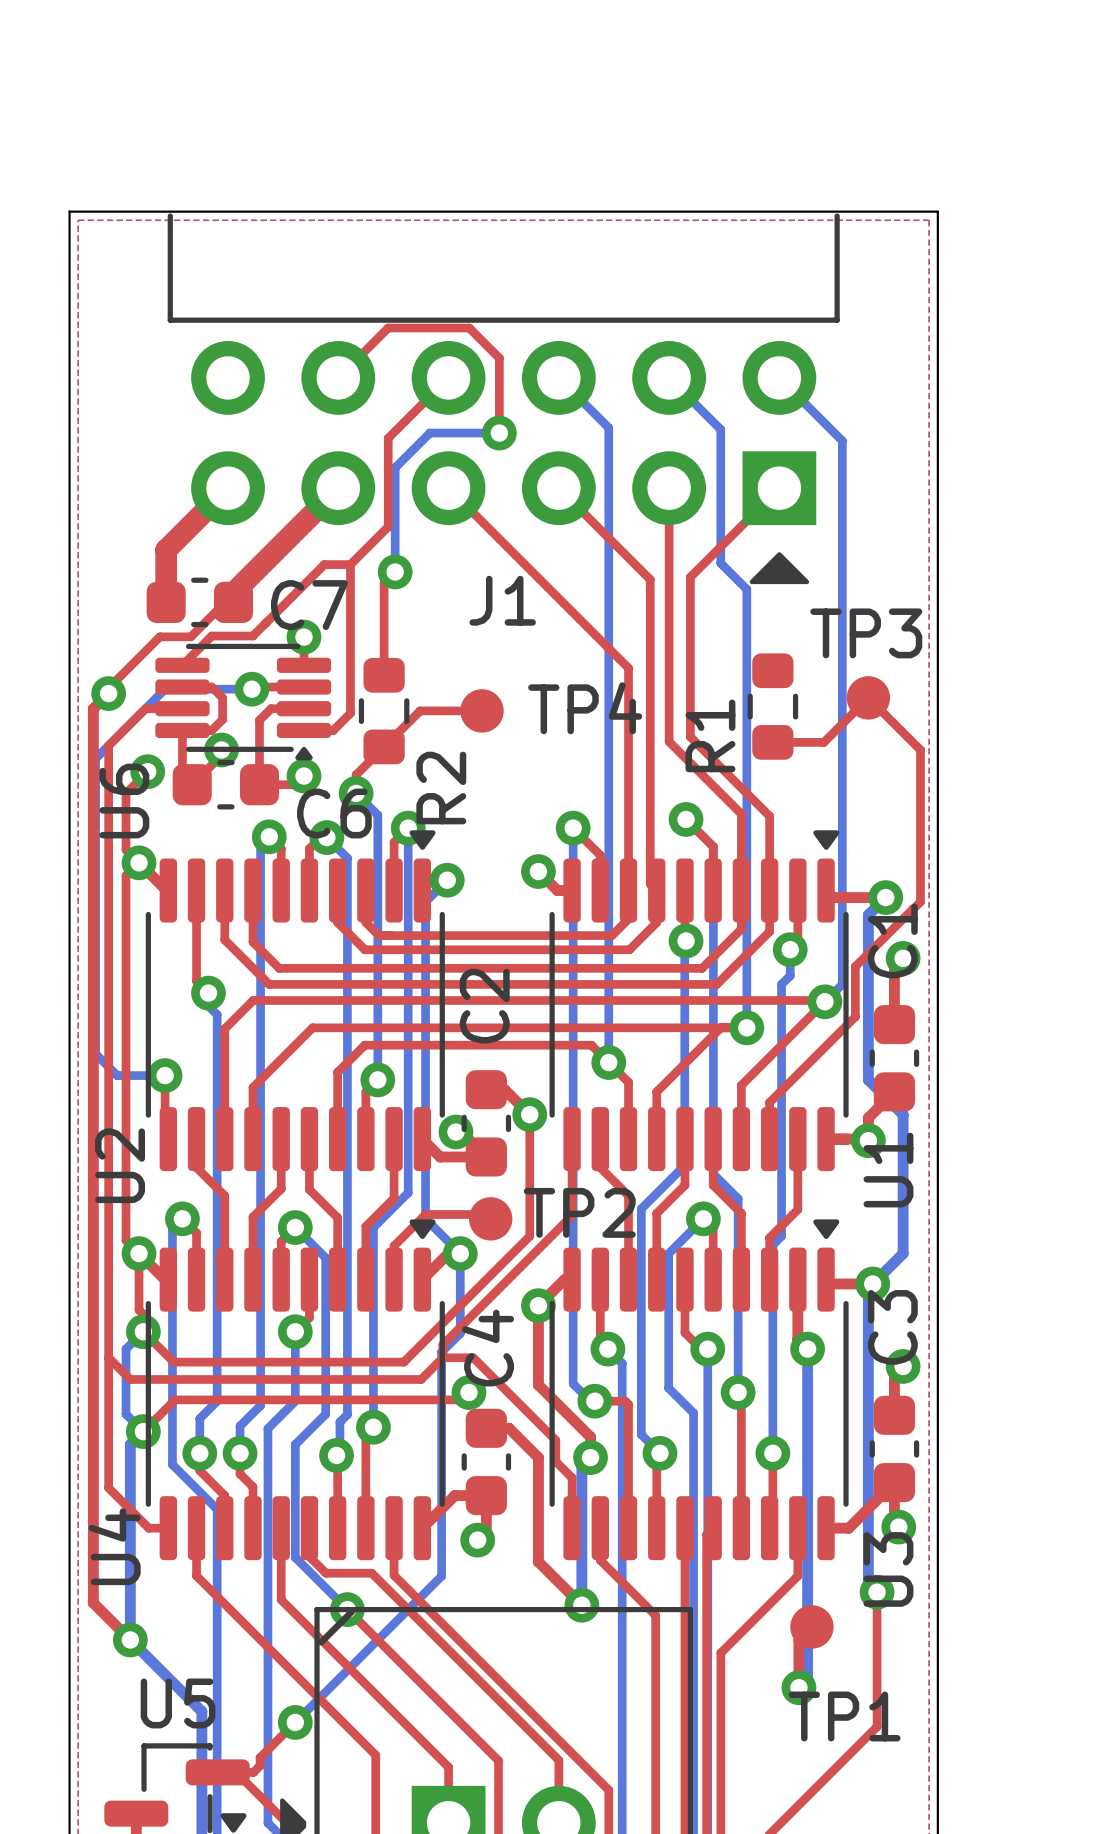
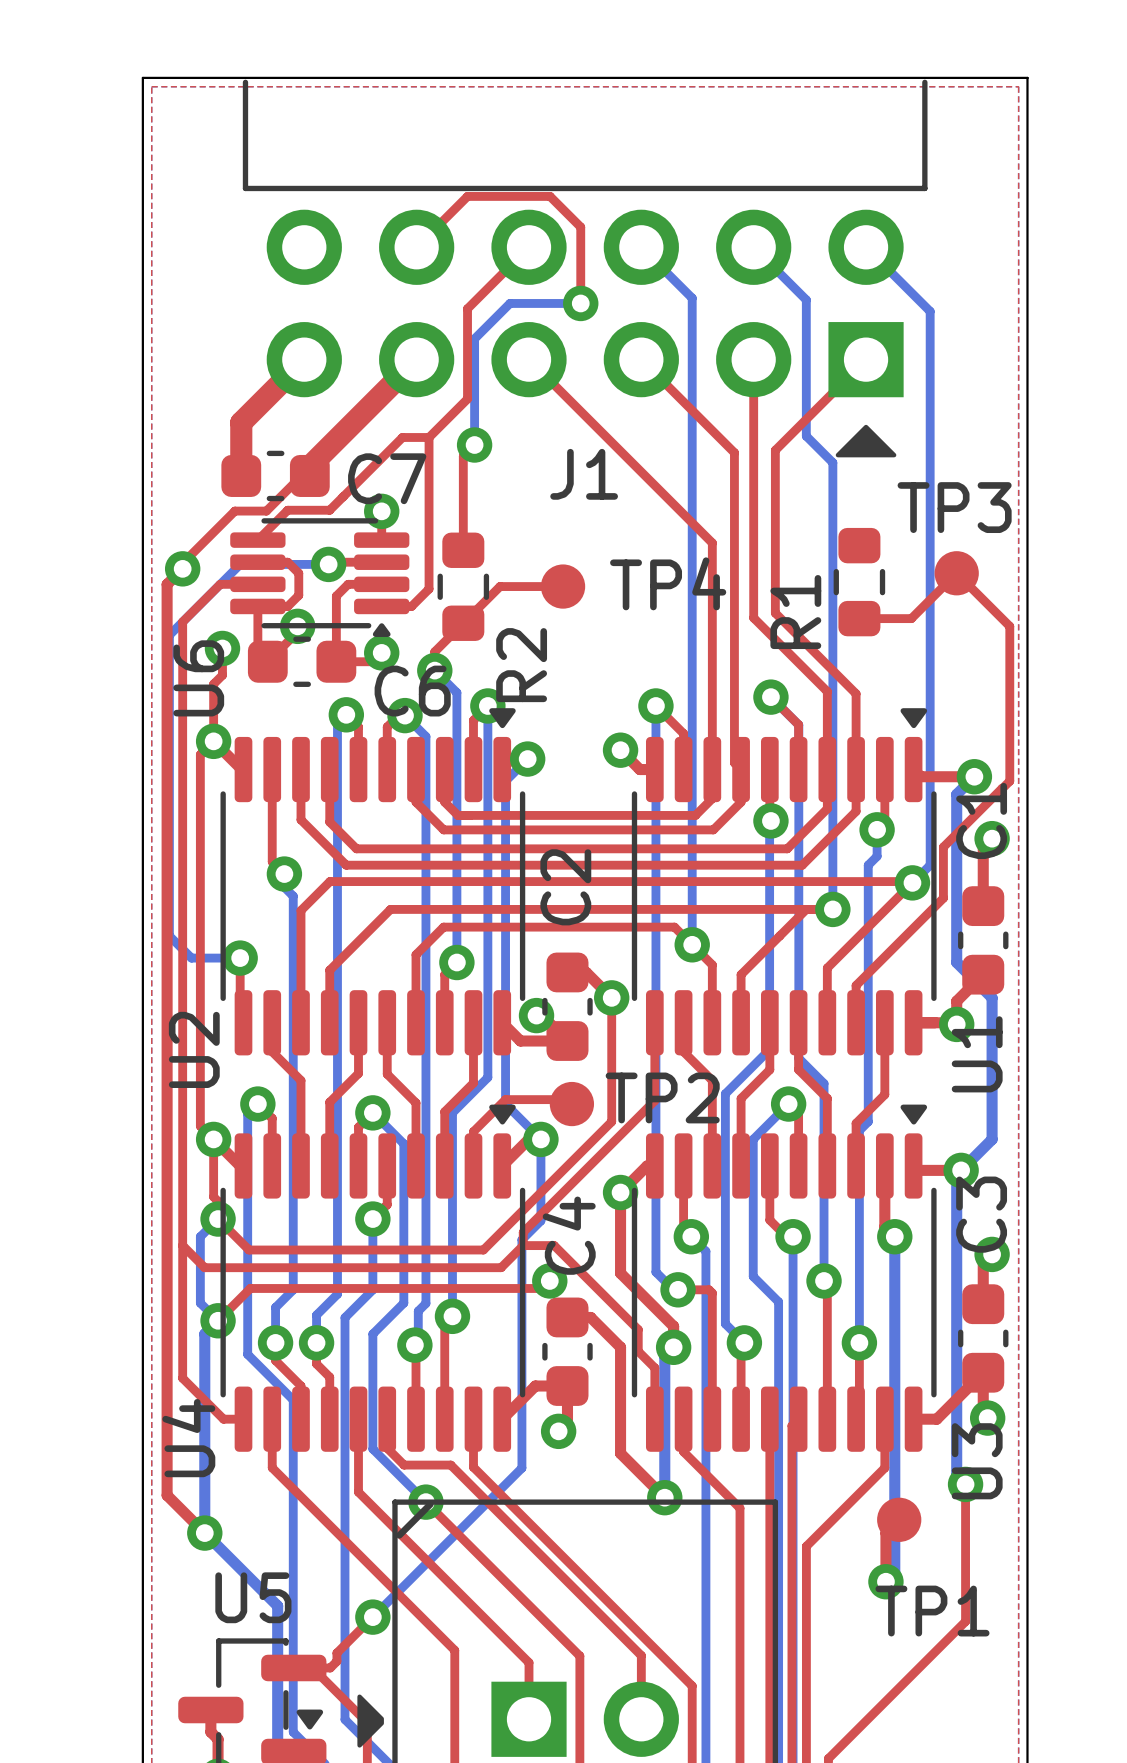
top track: (147, 771) (126, 793) (126, 849) (139, 862) -> (222, 648) (222, 675) (213, 684) (213, 741)

